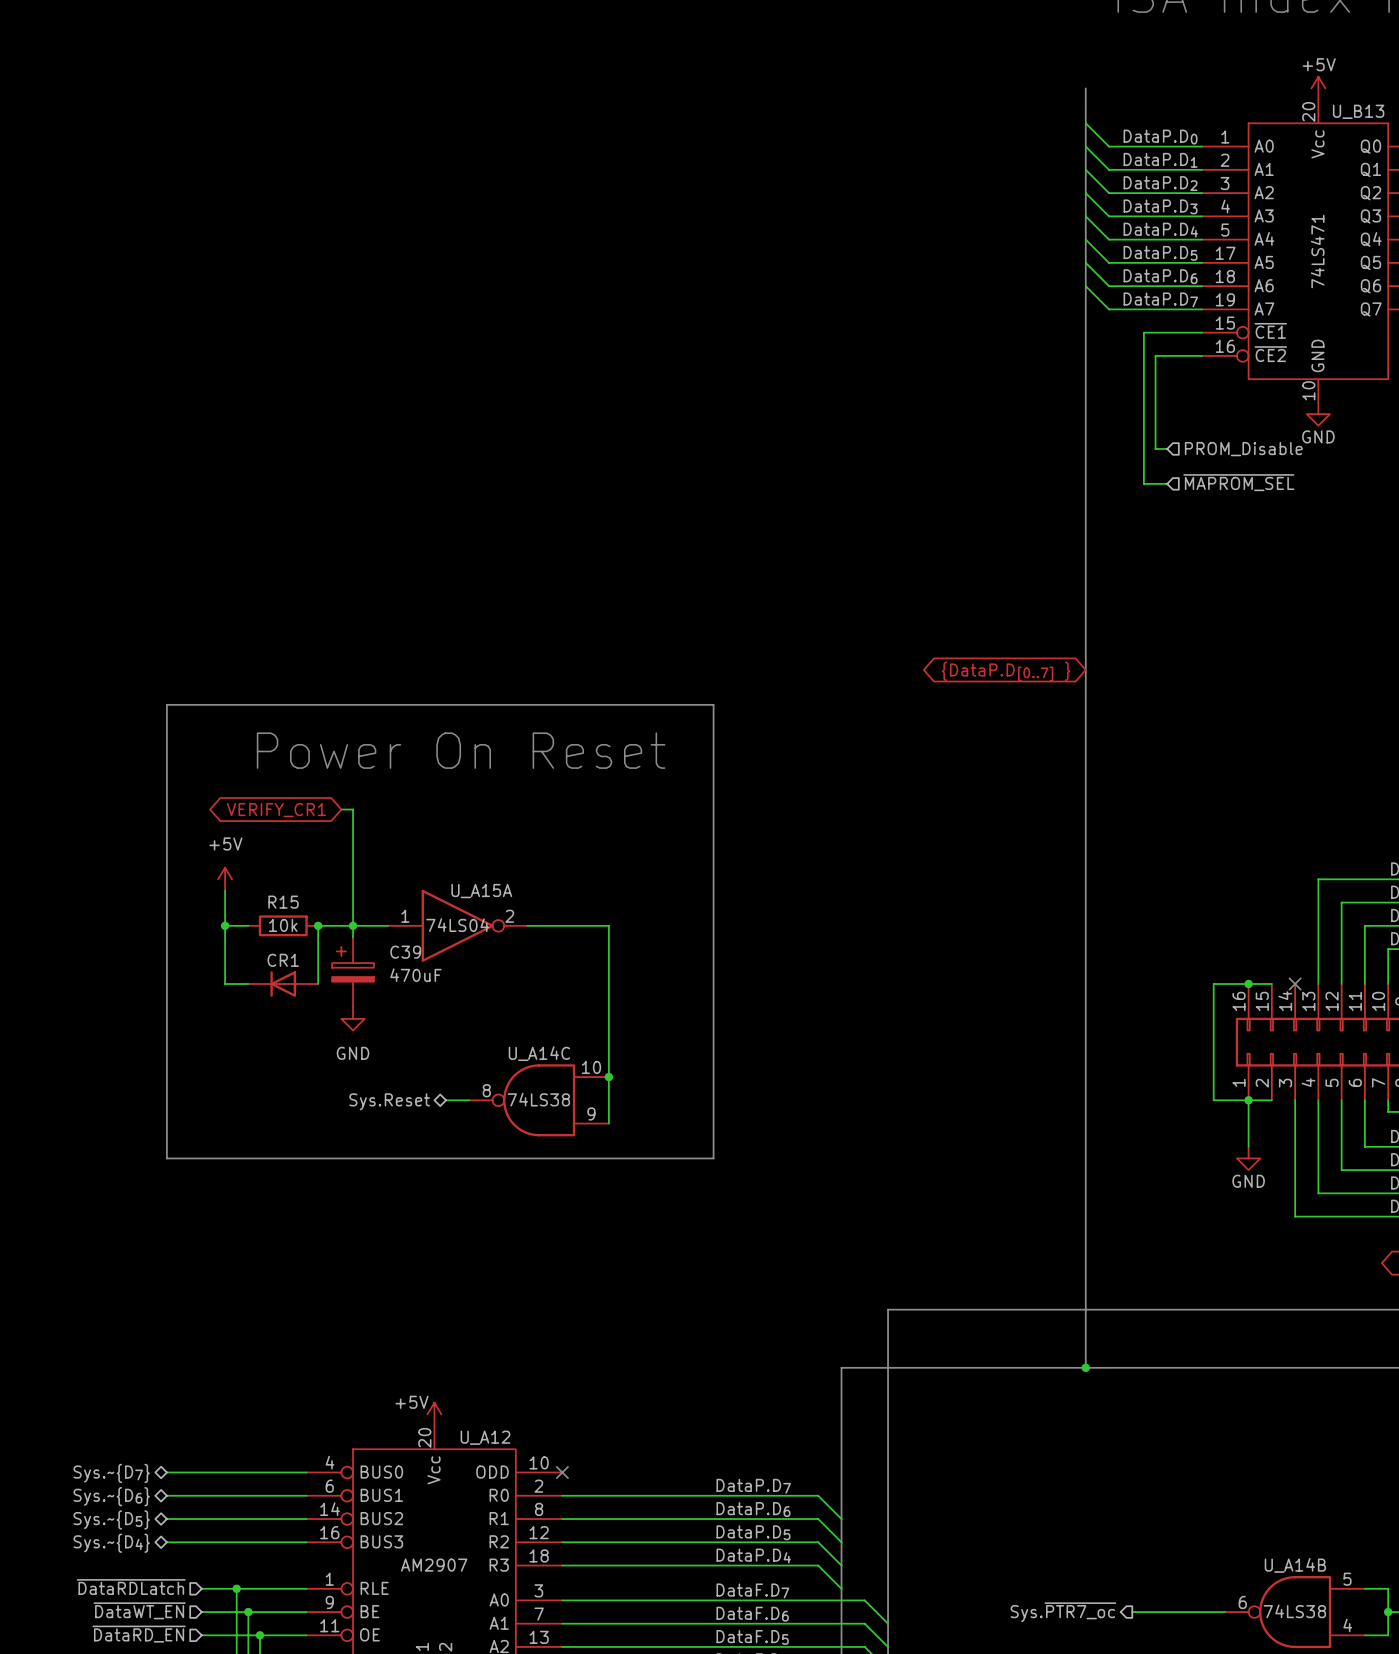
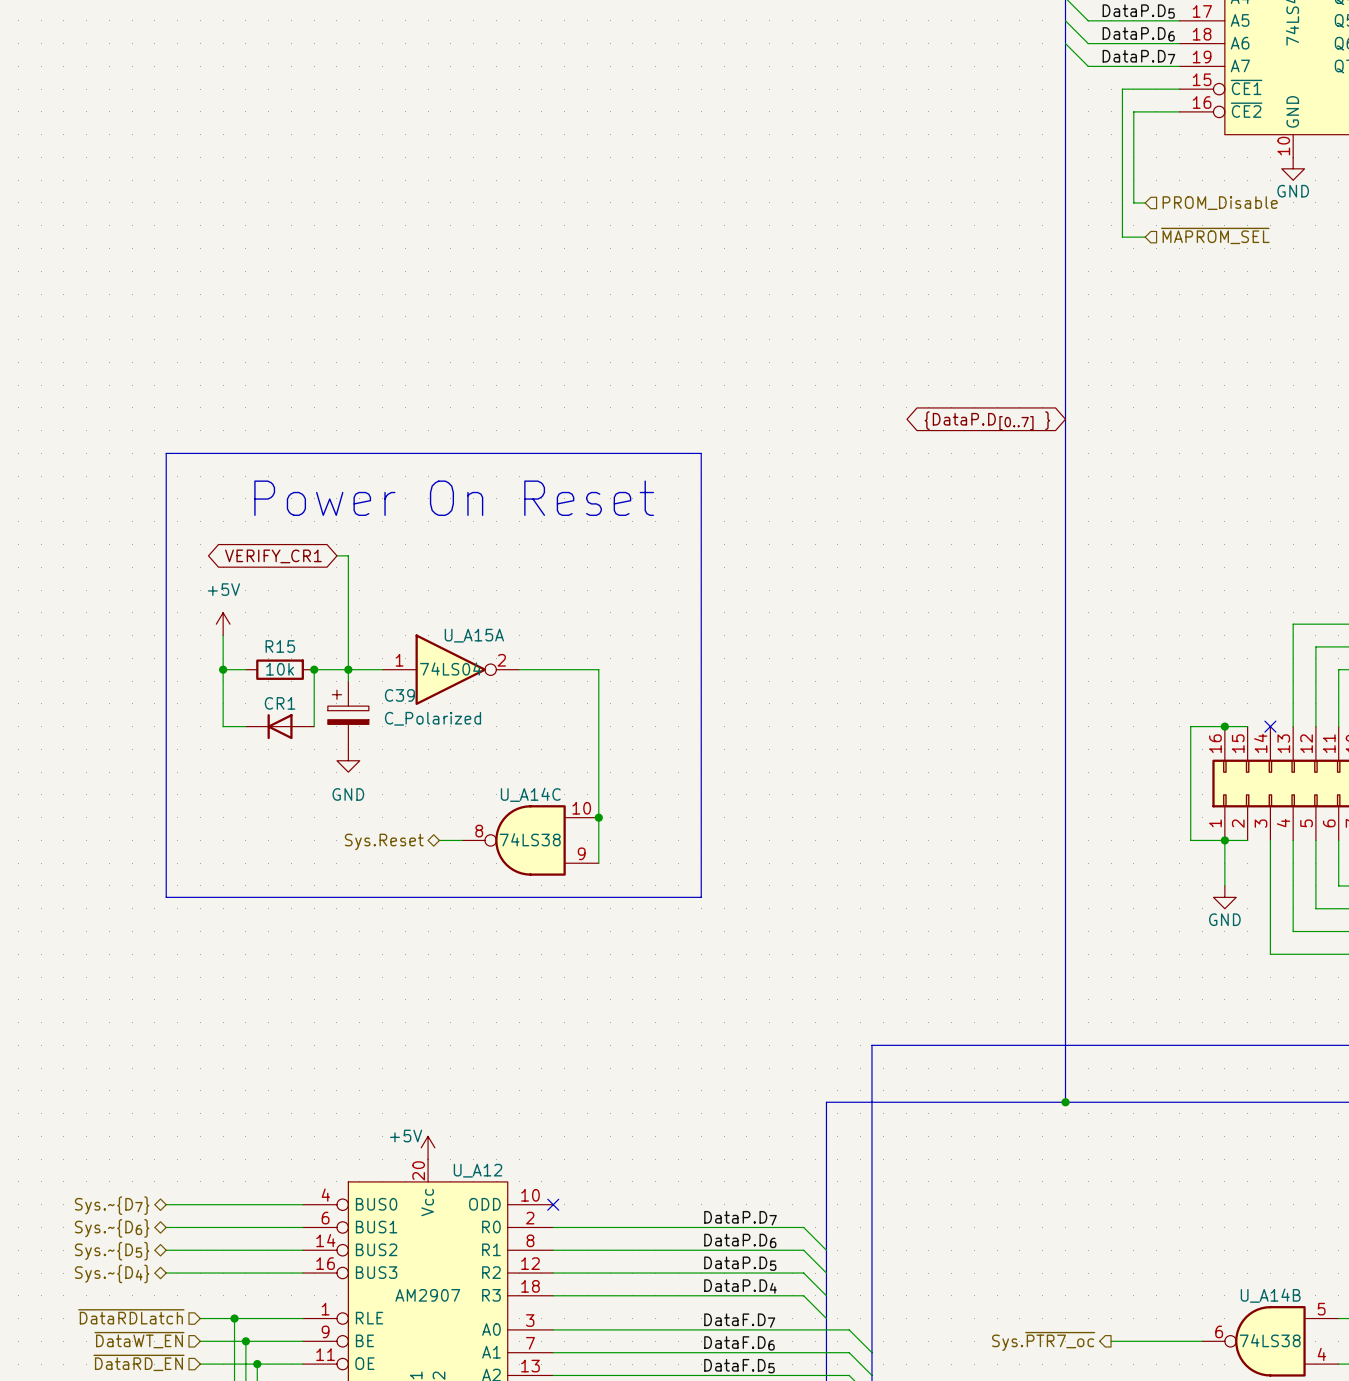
C39 value: 470uF (415, 975) -> C_Polarized (433, 718)

